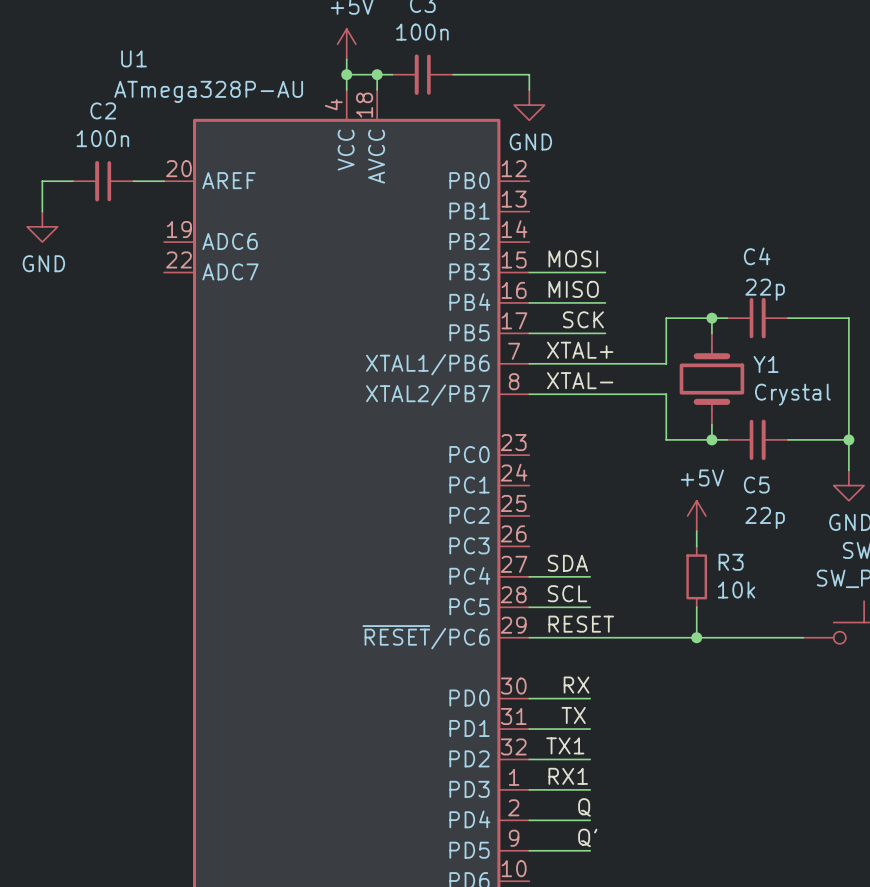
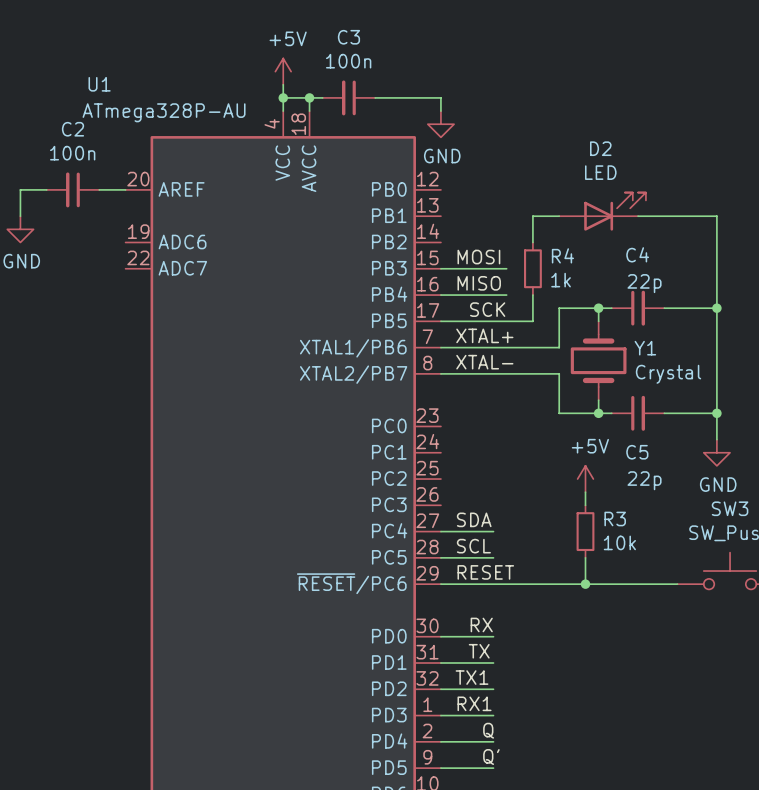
D2: none -> LED (602, 211)
wire: none -> (559, 216) (532, 216) (532, 242)
wire: none -> (638, 216) (716, 216) (716, 308)
R4: none -> 1k (532, 268)
wire: none -> (532, 295) (532, 321) (506, 321)
junction: none -> (716, 308)

